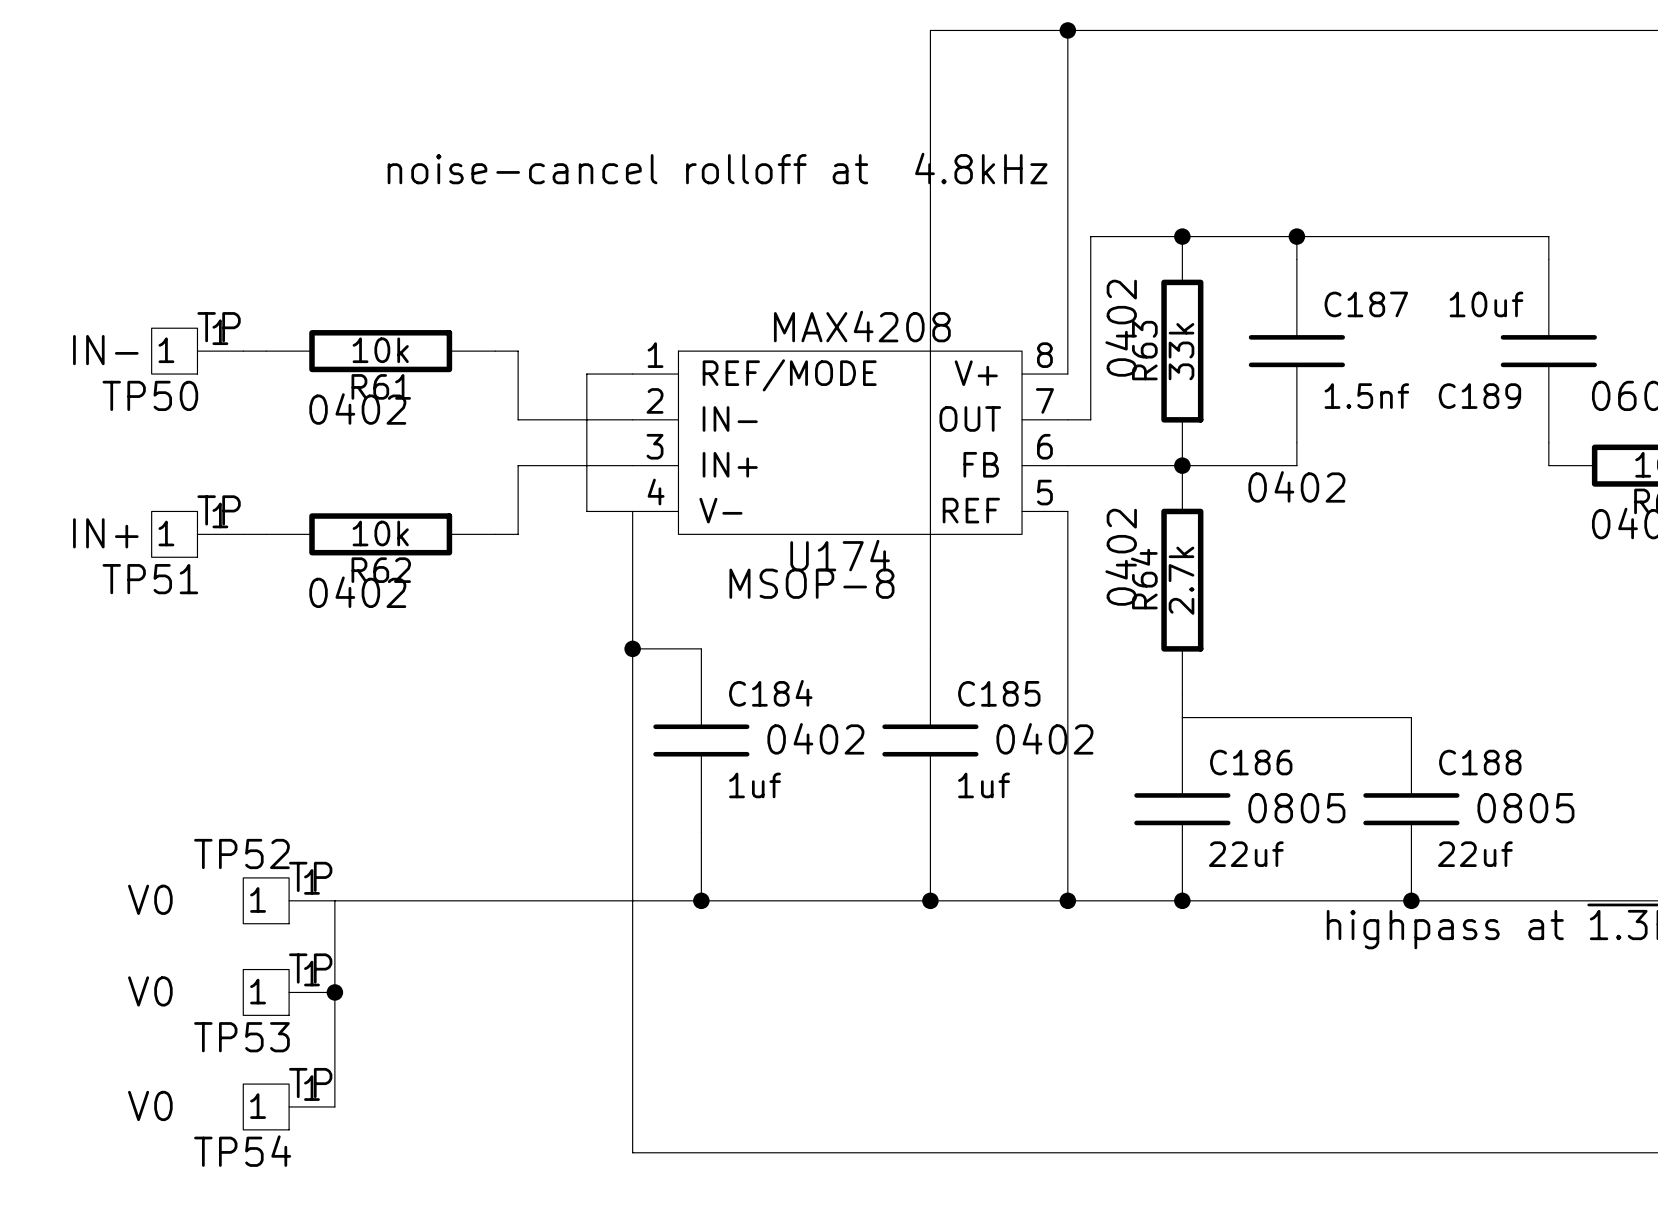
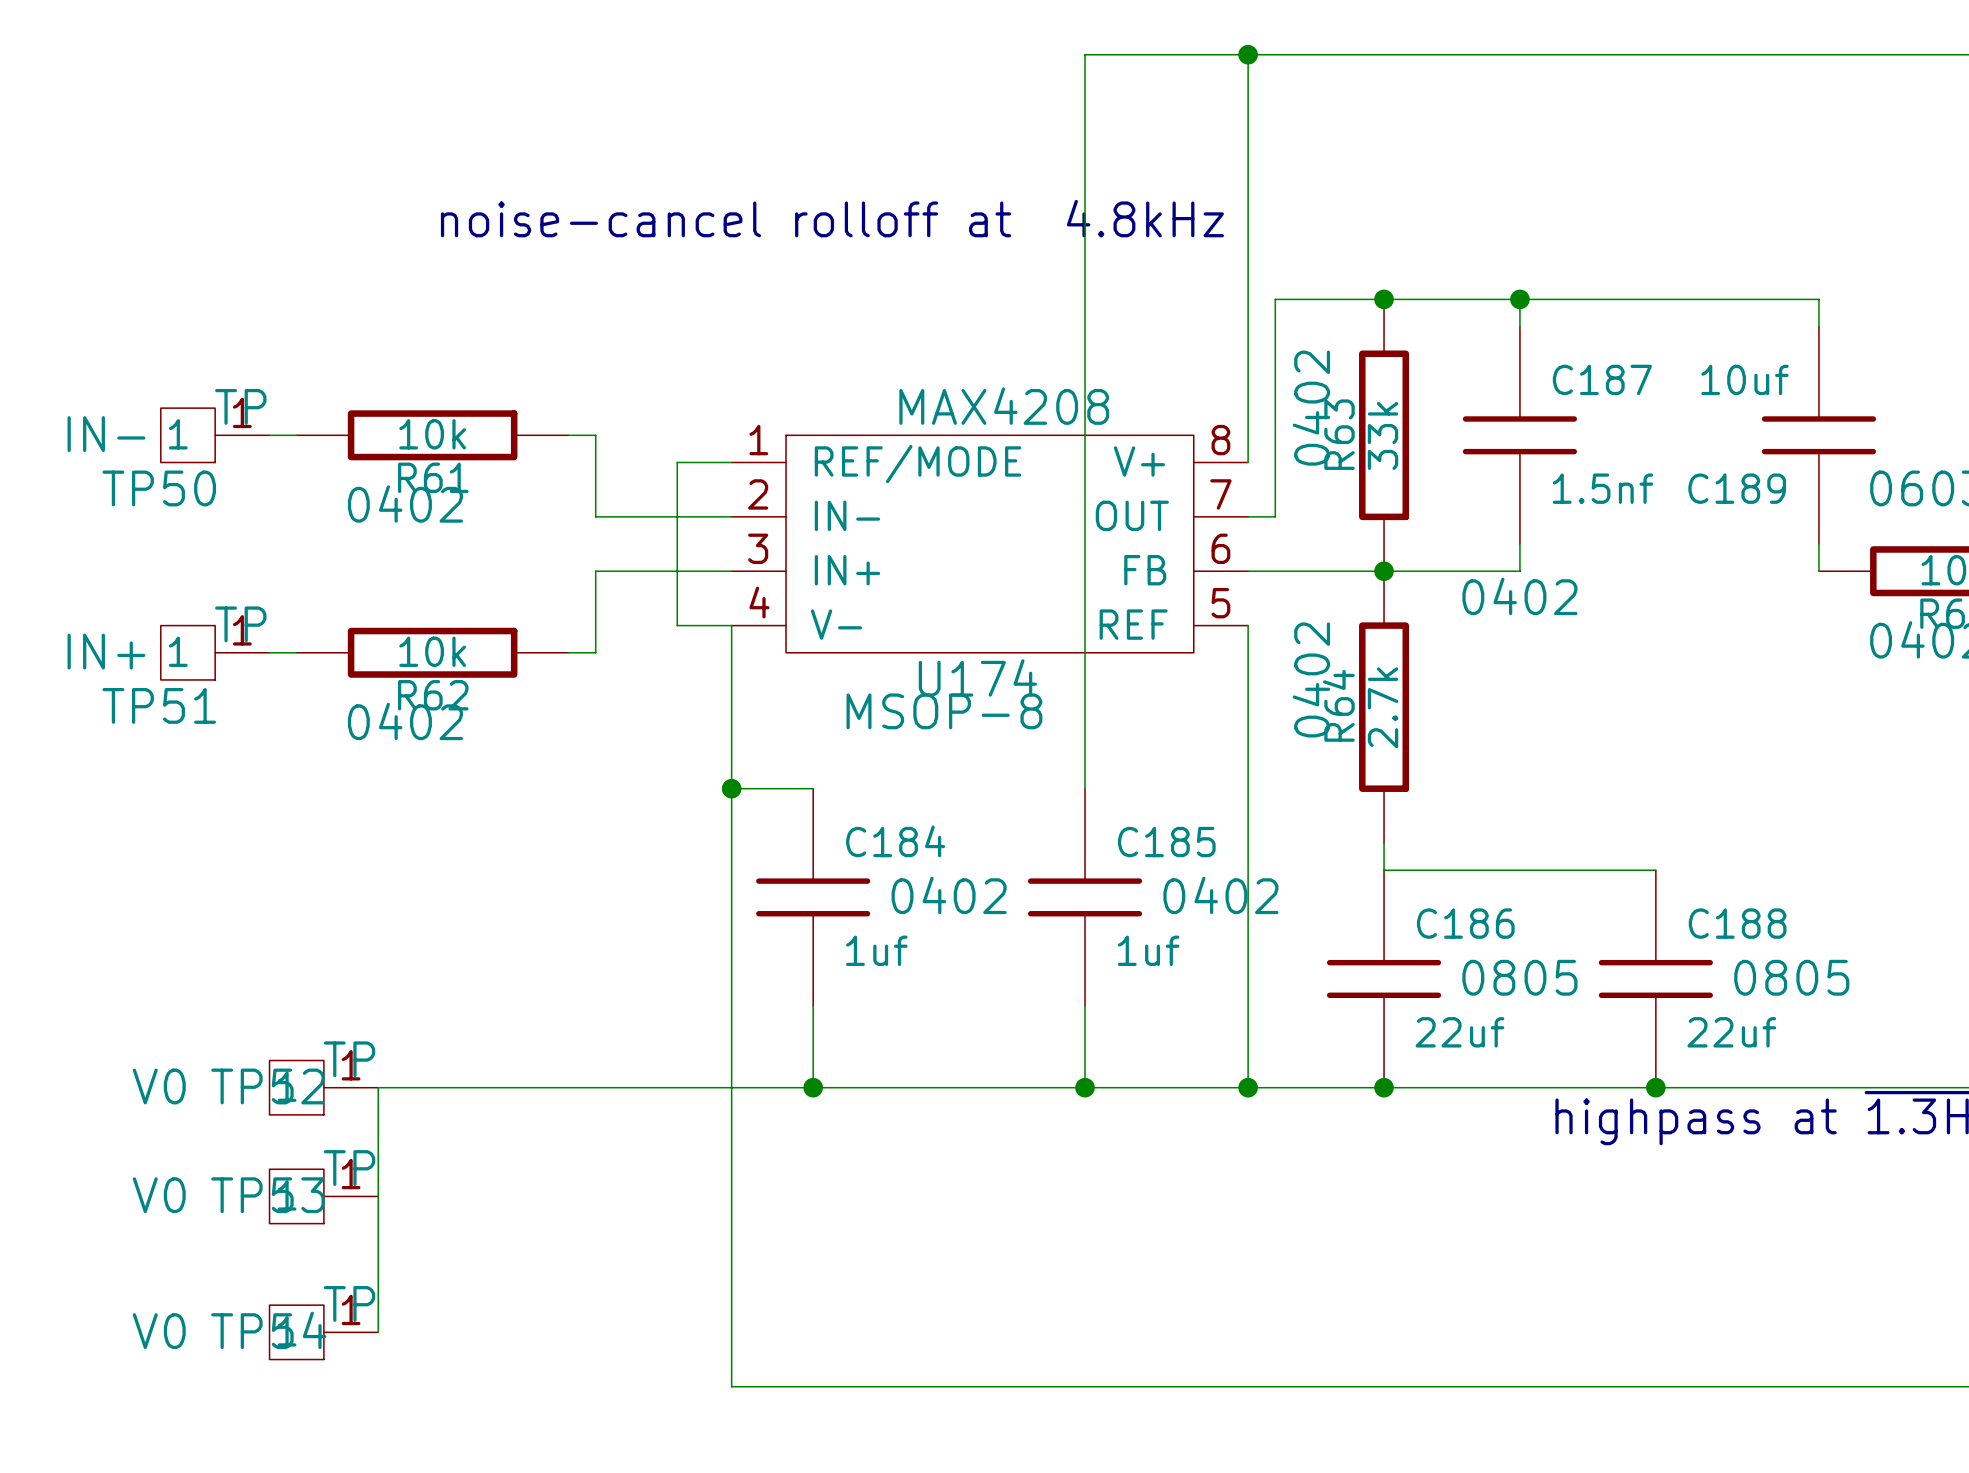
TP52 name position: TP52 (241, 853) -> TP52 (267, 1086)
junction: (334, 992) -> none
TP53 name position: TP53 (241, 1037) -> TP53 (267, 1195)
TP54 name position: TP54 (242, 1151) -> TP54 (268, 1330)

